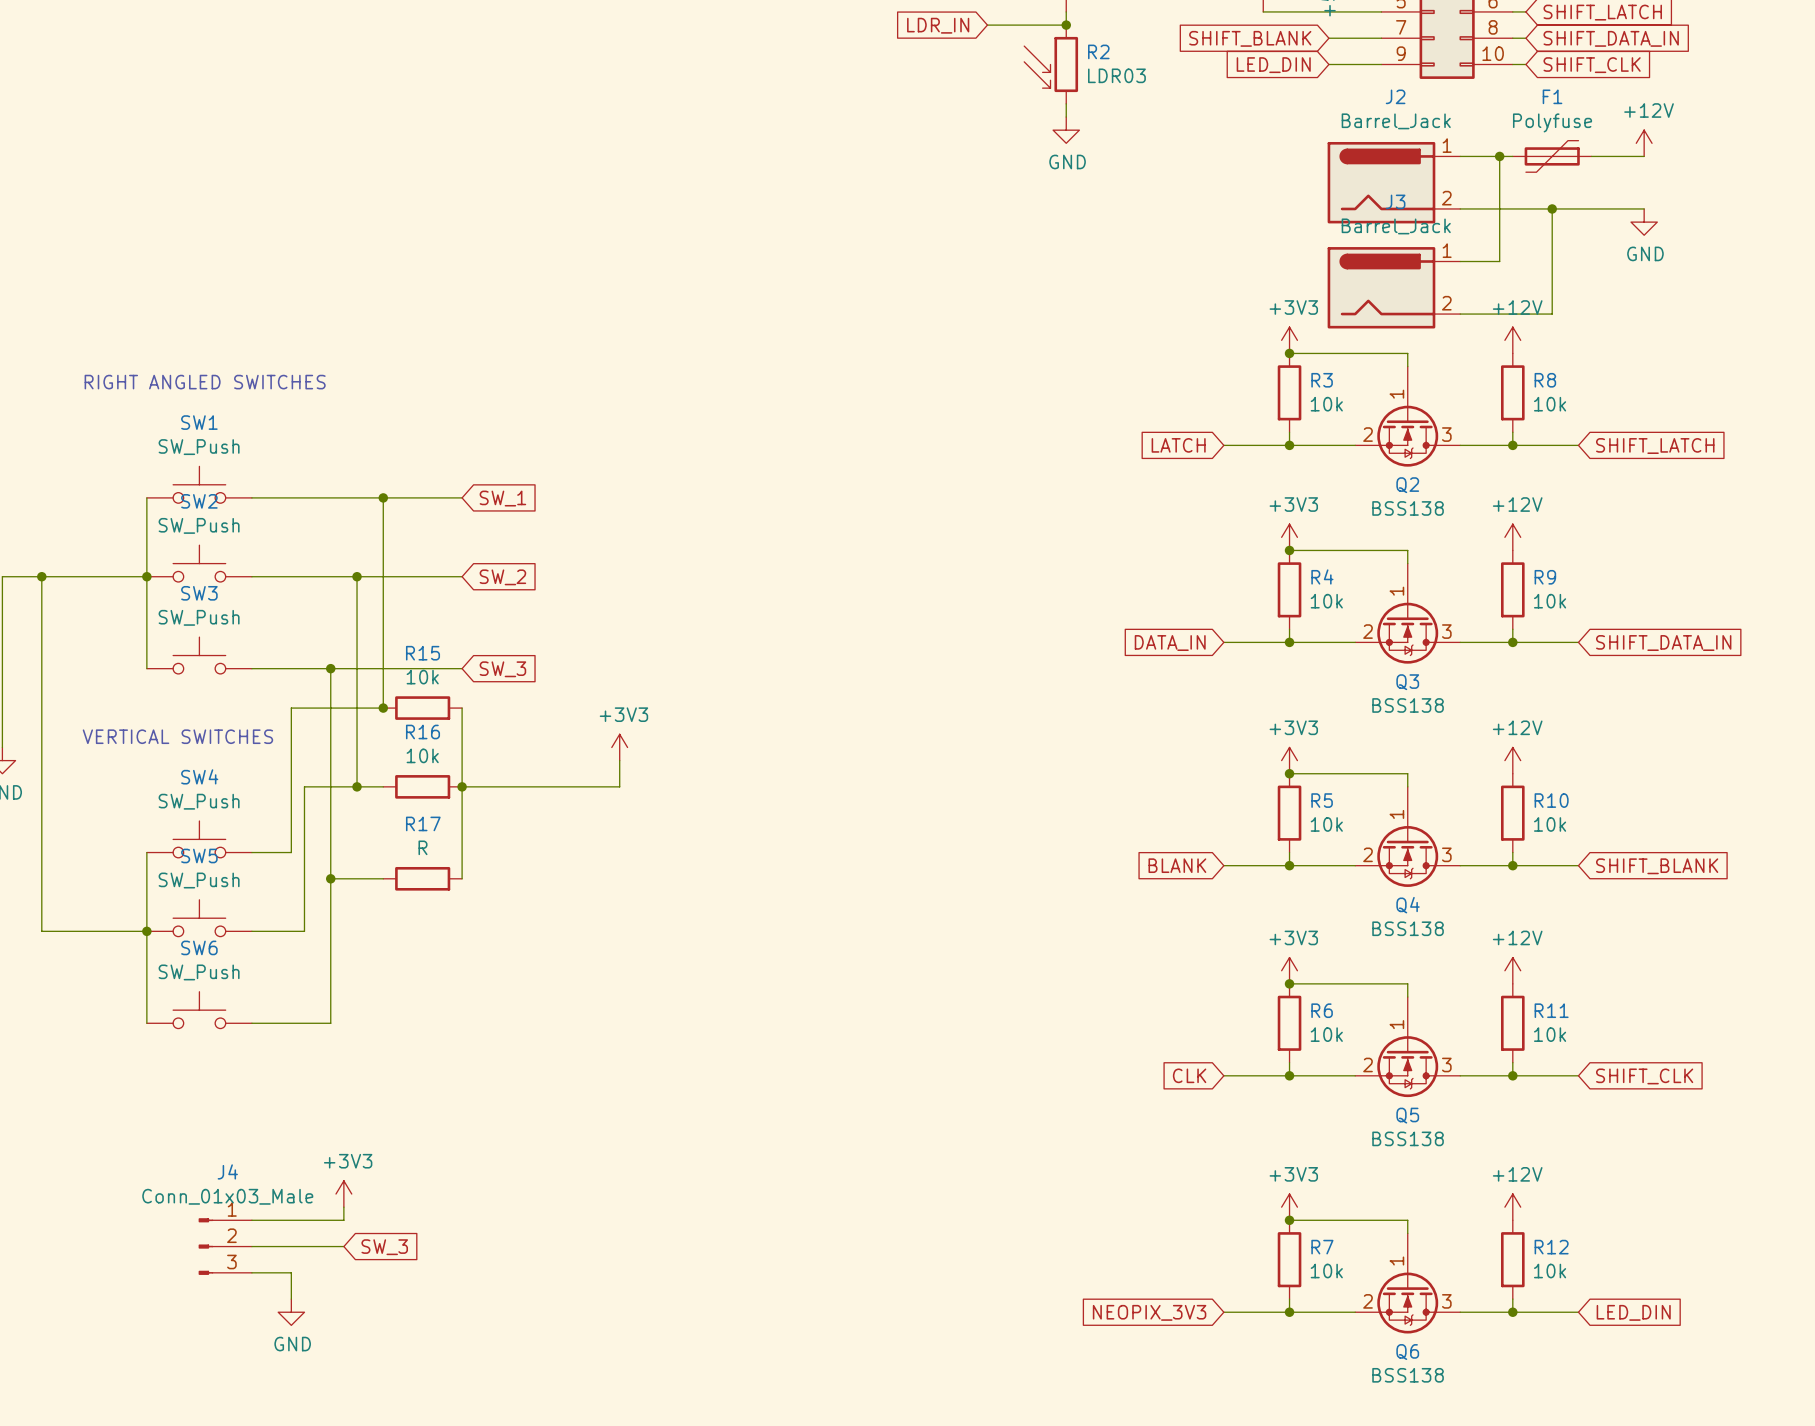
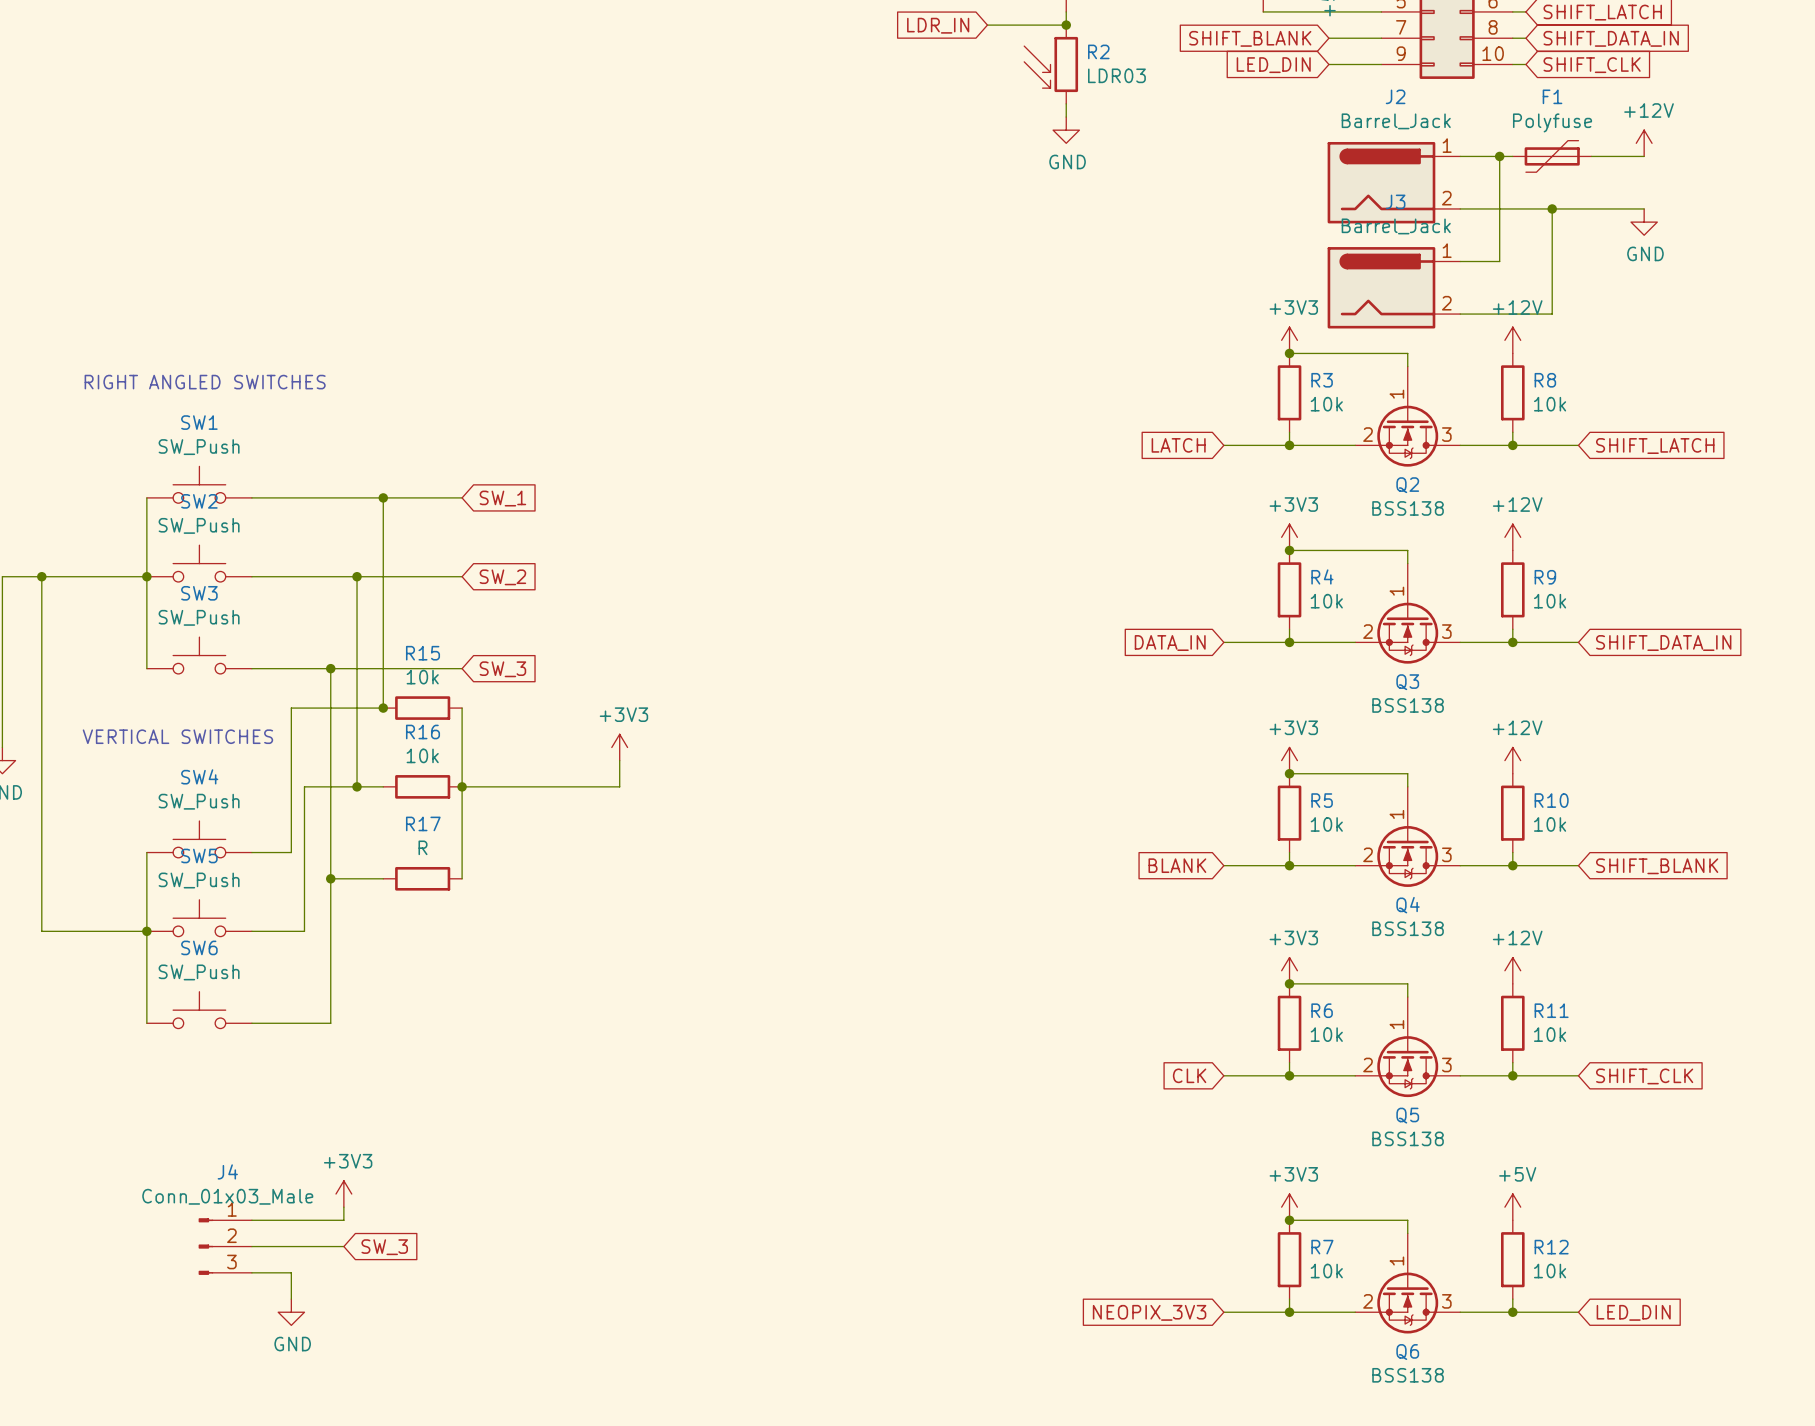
power symbol: +12V (1512, 1207) -> +5V (1512, 1207)

